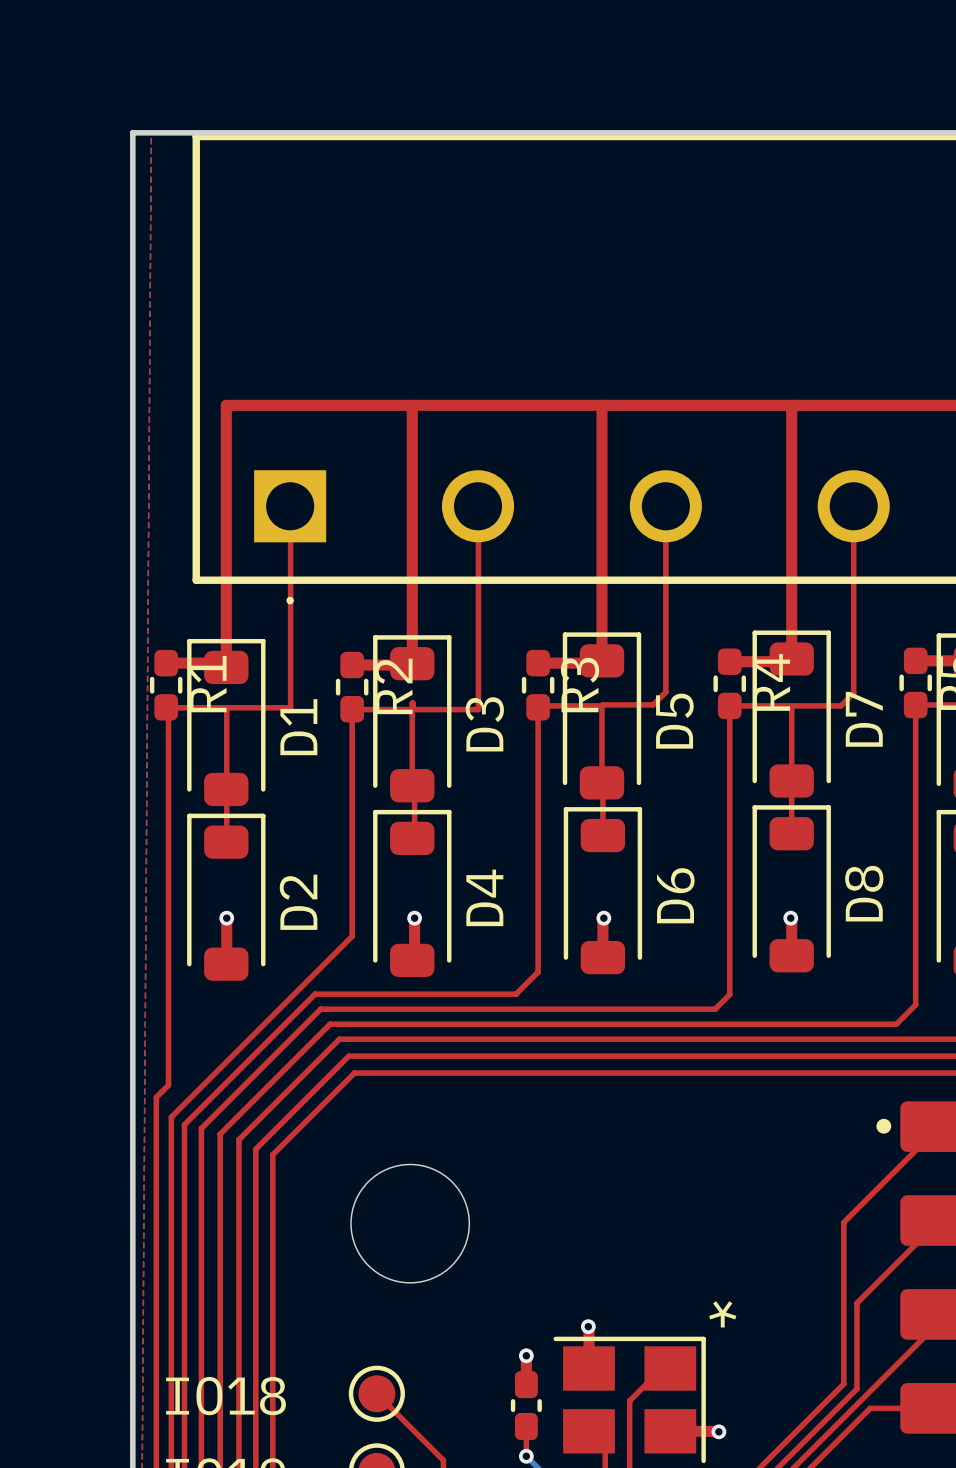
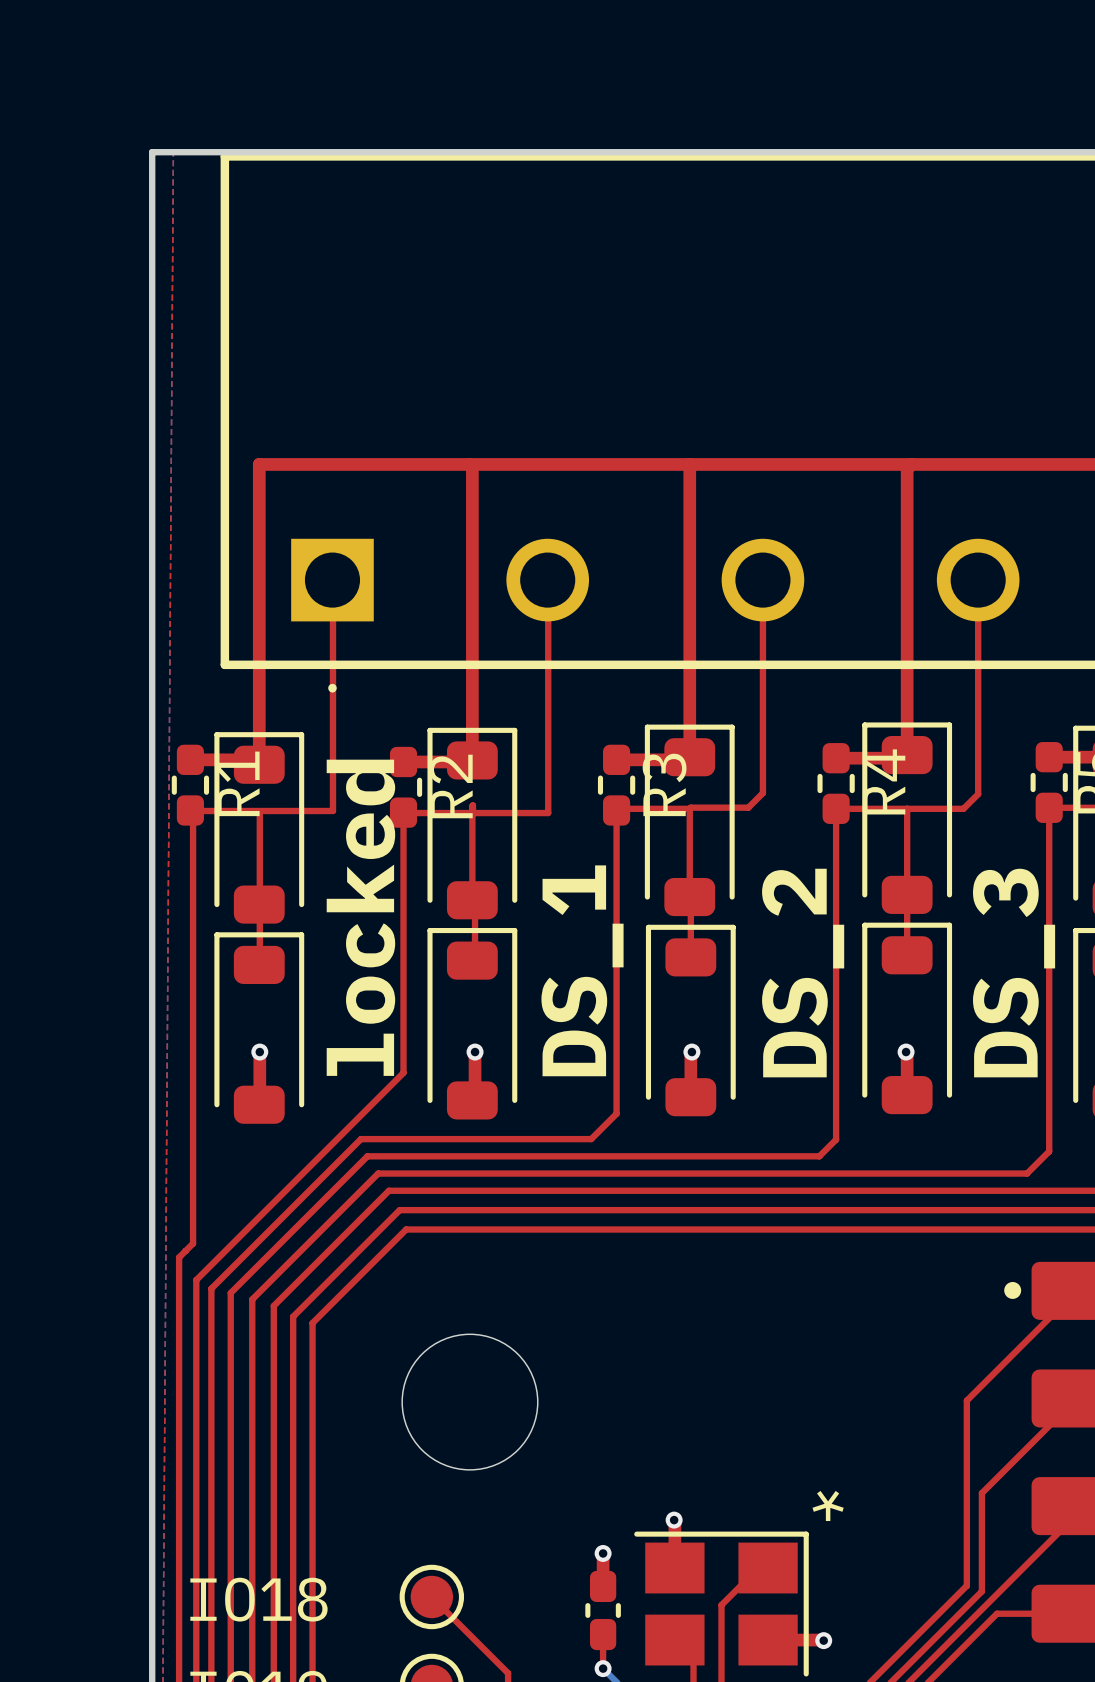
D7 name: D7 (864, 719) -> none
D5 name: D5 (674, 721) -> none
D3 name: D3 (484, 724) -> none
D1 name: D1 (298, 727) -> none
text: none -> locked (360, 917)
text: none -> DS_1 (582, 970)
text: none -> DS_2 (803, 973)
text: none -> DS_3 (1014, 973)
D8 name: D8 (864, 893) -> none
D6 name: D6 (675, 895) -> none
D4 name: D4 (484, 897) -> none
D2 name: D2 (298, 902) -> none

